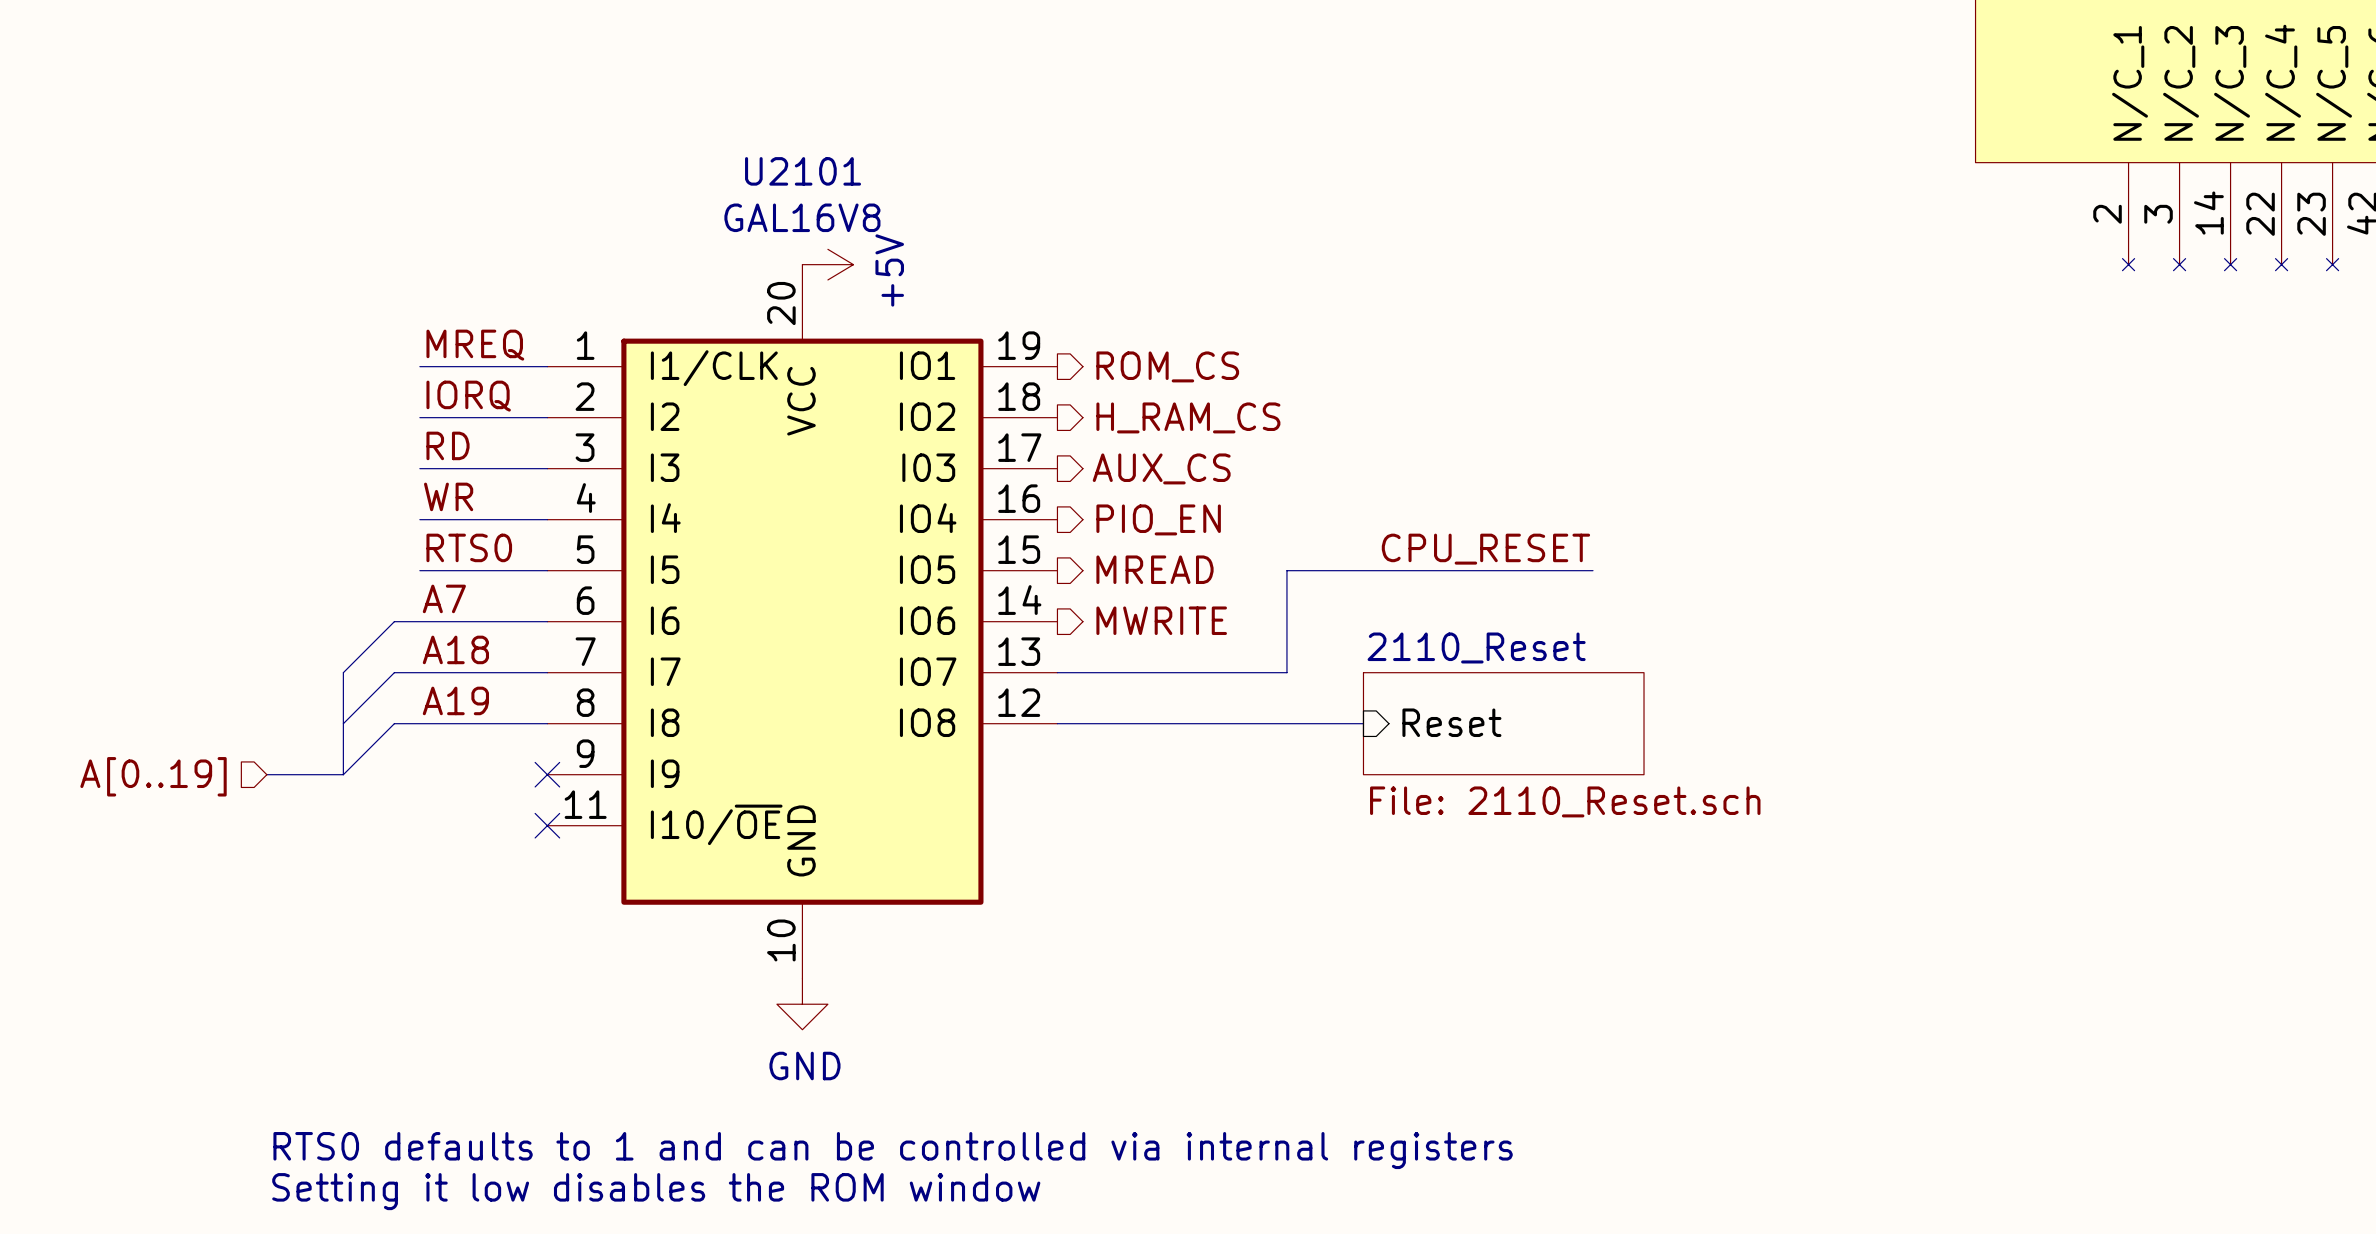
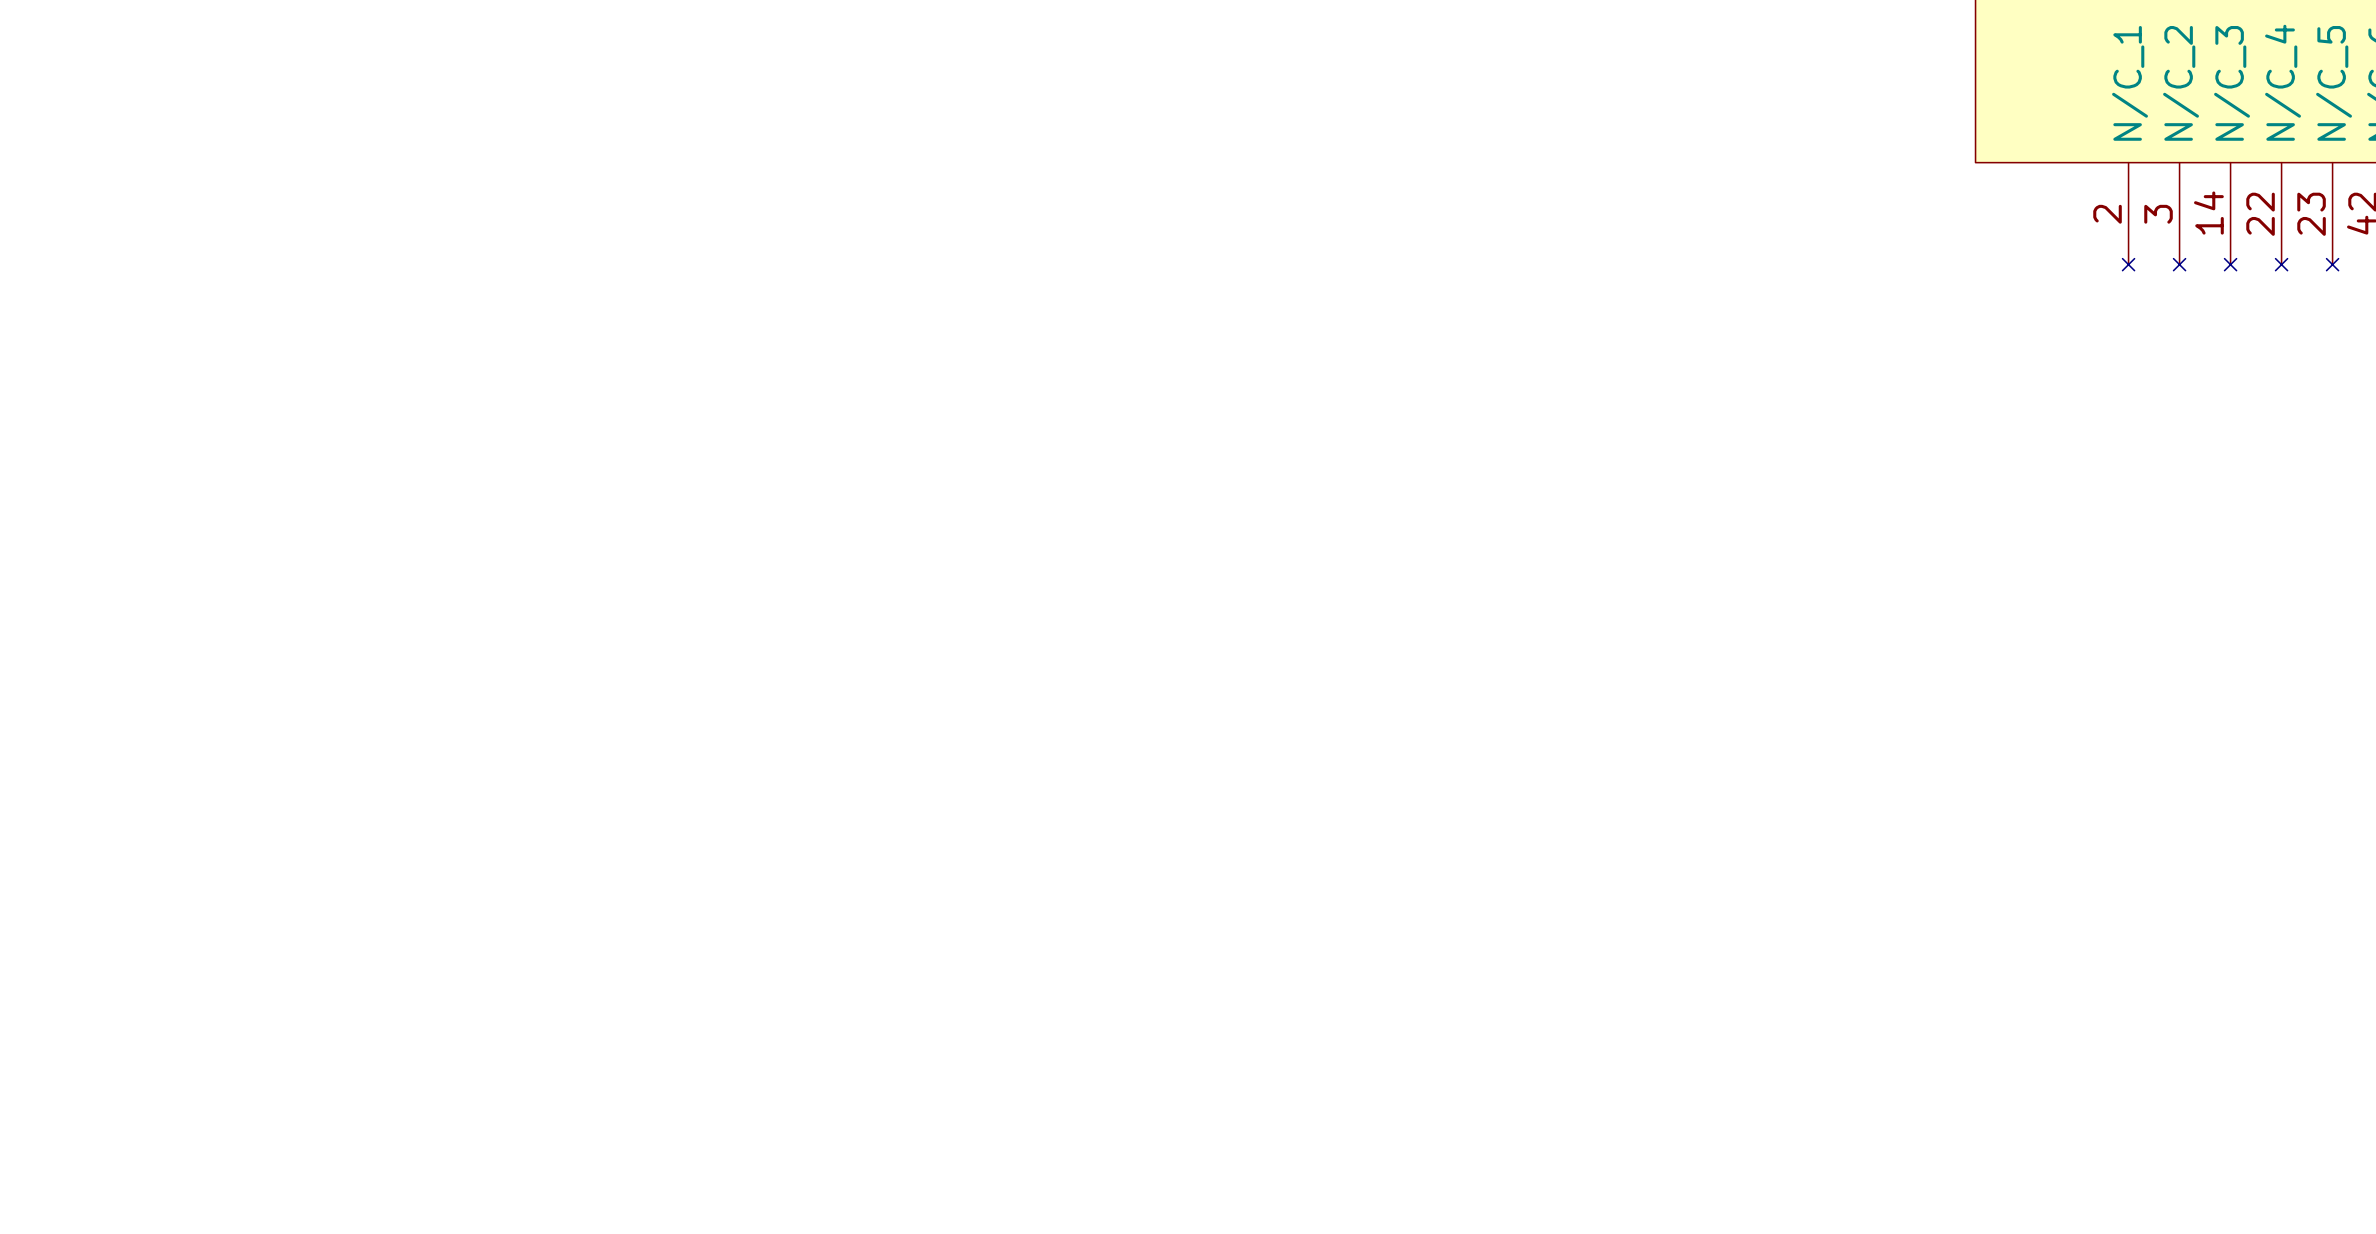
power symbol: +5V (827, 264) -> none
label: MREQ (475, 345) -> none
wire: (419, 366) (547, 366) -> none
hierarchical label: ROM_CS (1167, 366) -> none
label: IORQ (468, 396) -> none
wire: (419, 417) (547, 417) -> none
hierarchical label: H_RAM_CS (1188, 417) -> none
label: RD (448, 445) -> none
wire: (419, 468) (547, 468) -> none
hierarchical label: AUX_CS (1161, 468) -> none
label: WR (448, 496) -> none
wire: (419, 519) (547, 519) -> none
hierarchical label: PIO_EN (1158, 519) -> none
label: RTS0 (469, 547) -> none
label: CPU_RESET (1485, 549) -> none
hierarchical label: MREAD (1154, 569) -> none
wire: (419, 570) (547, 570) -> none
wire: (1593, 570) (1286, 570) (1286, 672) (1057, 672) -> none
label: A7 (444, 598) -> none
hierarchical label: MWRITE (1161, 620) -> none
wire: (547, 621) (394, 621) (343, 672) -> none
U2101: GAL16V8 (802, 621) -> none
label: A18 (455, 649) -> none
bus: (343, 672) (343, 774) (266, 774) -> none
wire: (547, 672) (394, 672) (343, 723) -> none
label: A19 (455, 700) -> none
sheet pin: Reset (1451, 722) -> none
wire: (547, 723) (394, 723) (343, 774) -> none
wire: (1057, 723) (1363, 723) -> none
sheet 2110_Reset: File: 2110_Reset.sch (1503, 723) -> none
no-connect mark: (547, 774) -> none
hierarchical label: A[0..19] (153, 776) -> none
no-connect mark: (547, 825) -> none
power symbol: GND (802, 1004) -> none
text: RTS0 defaults to 1 and can be controlled via internal registers (893, 1150) -> none
text: Setting it low disables the ROM window (656, 1191) -> none

